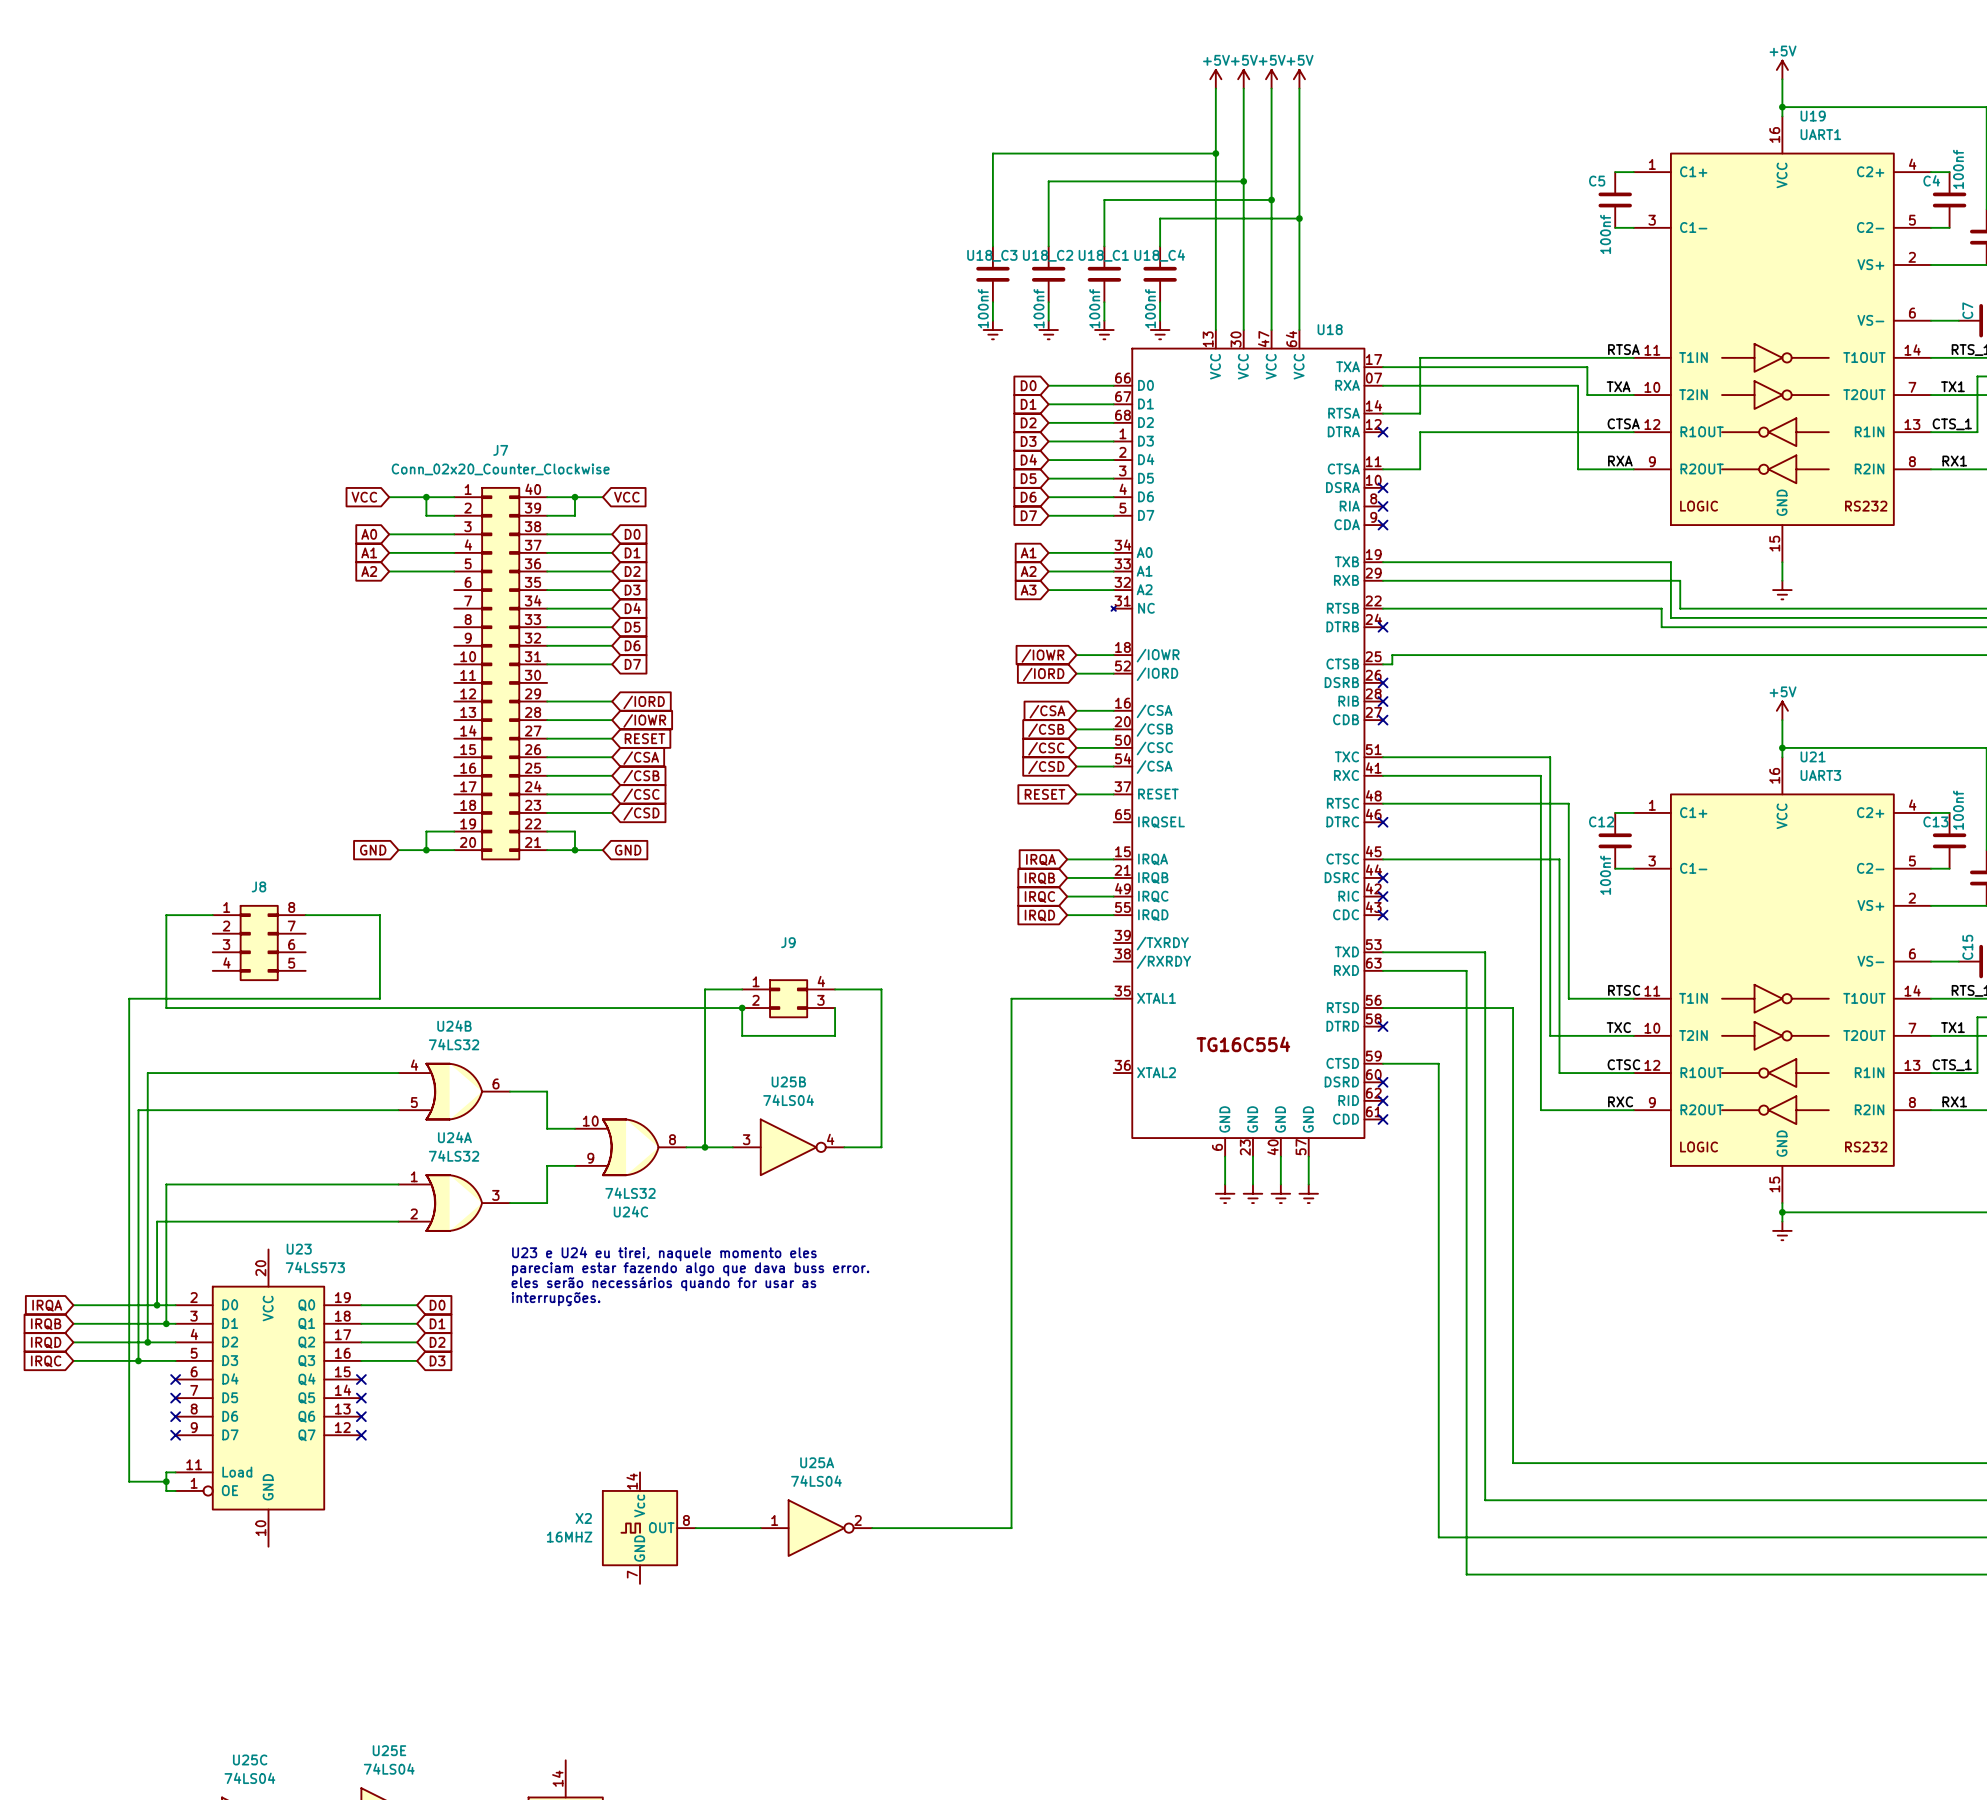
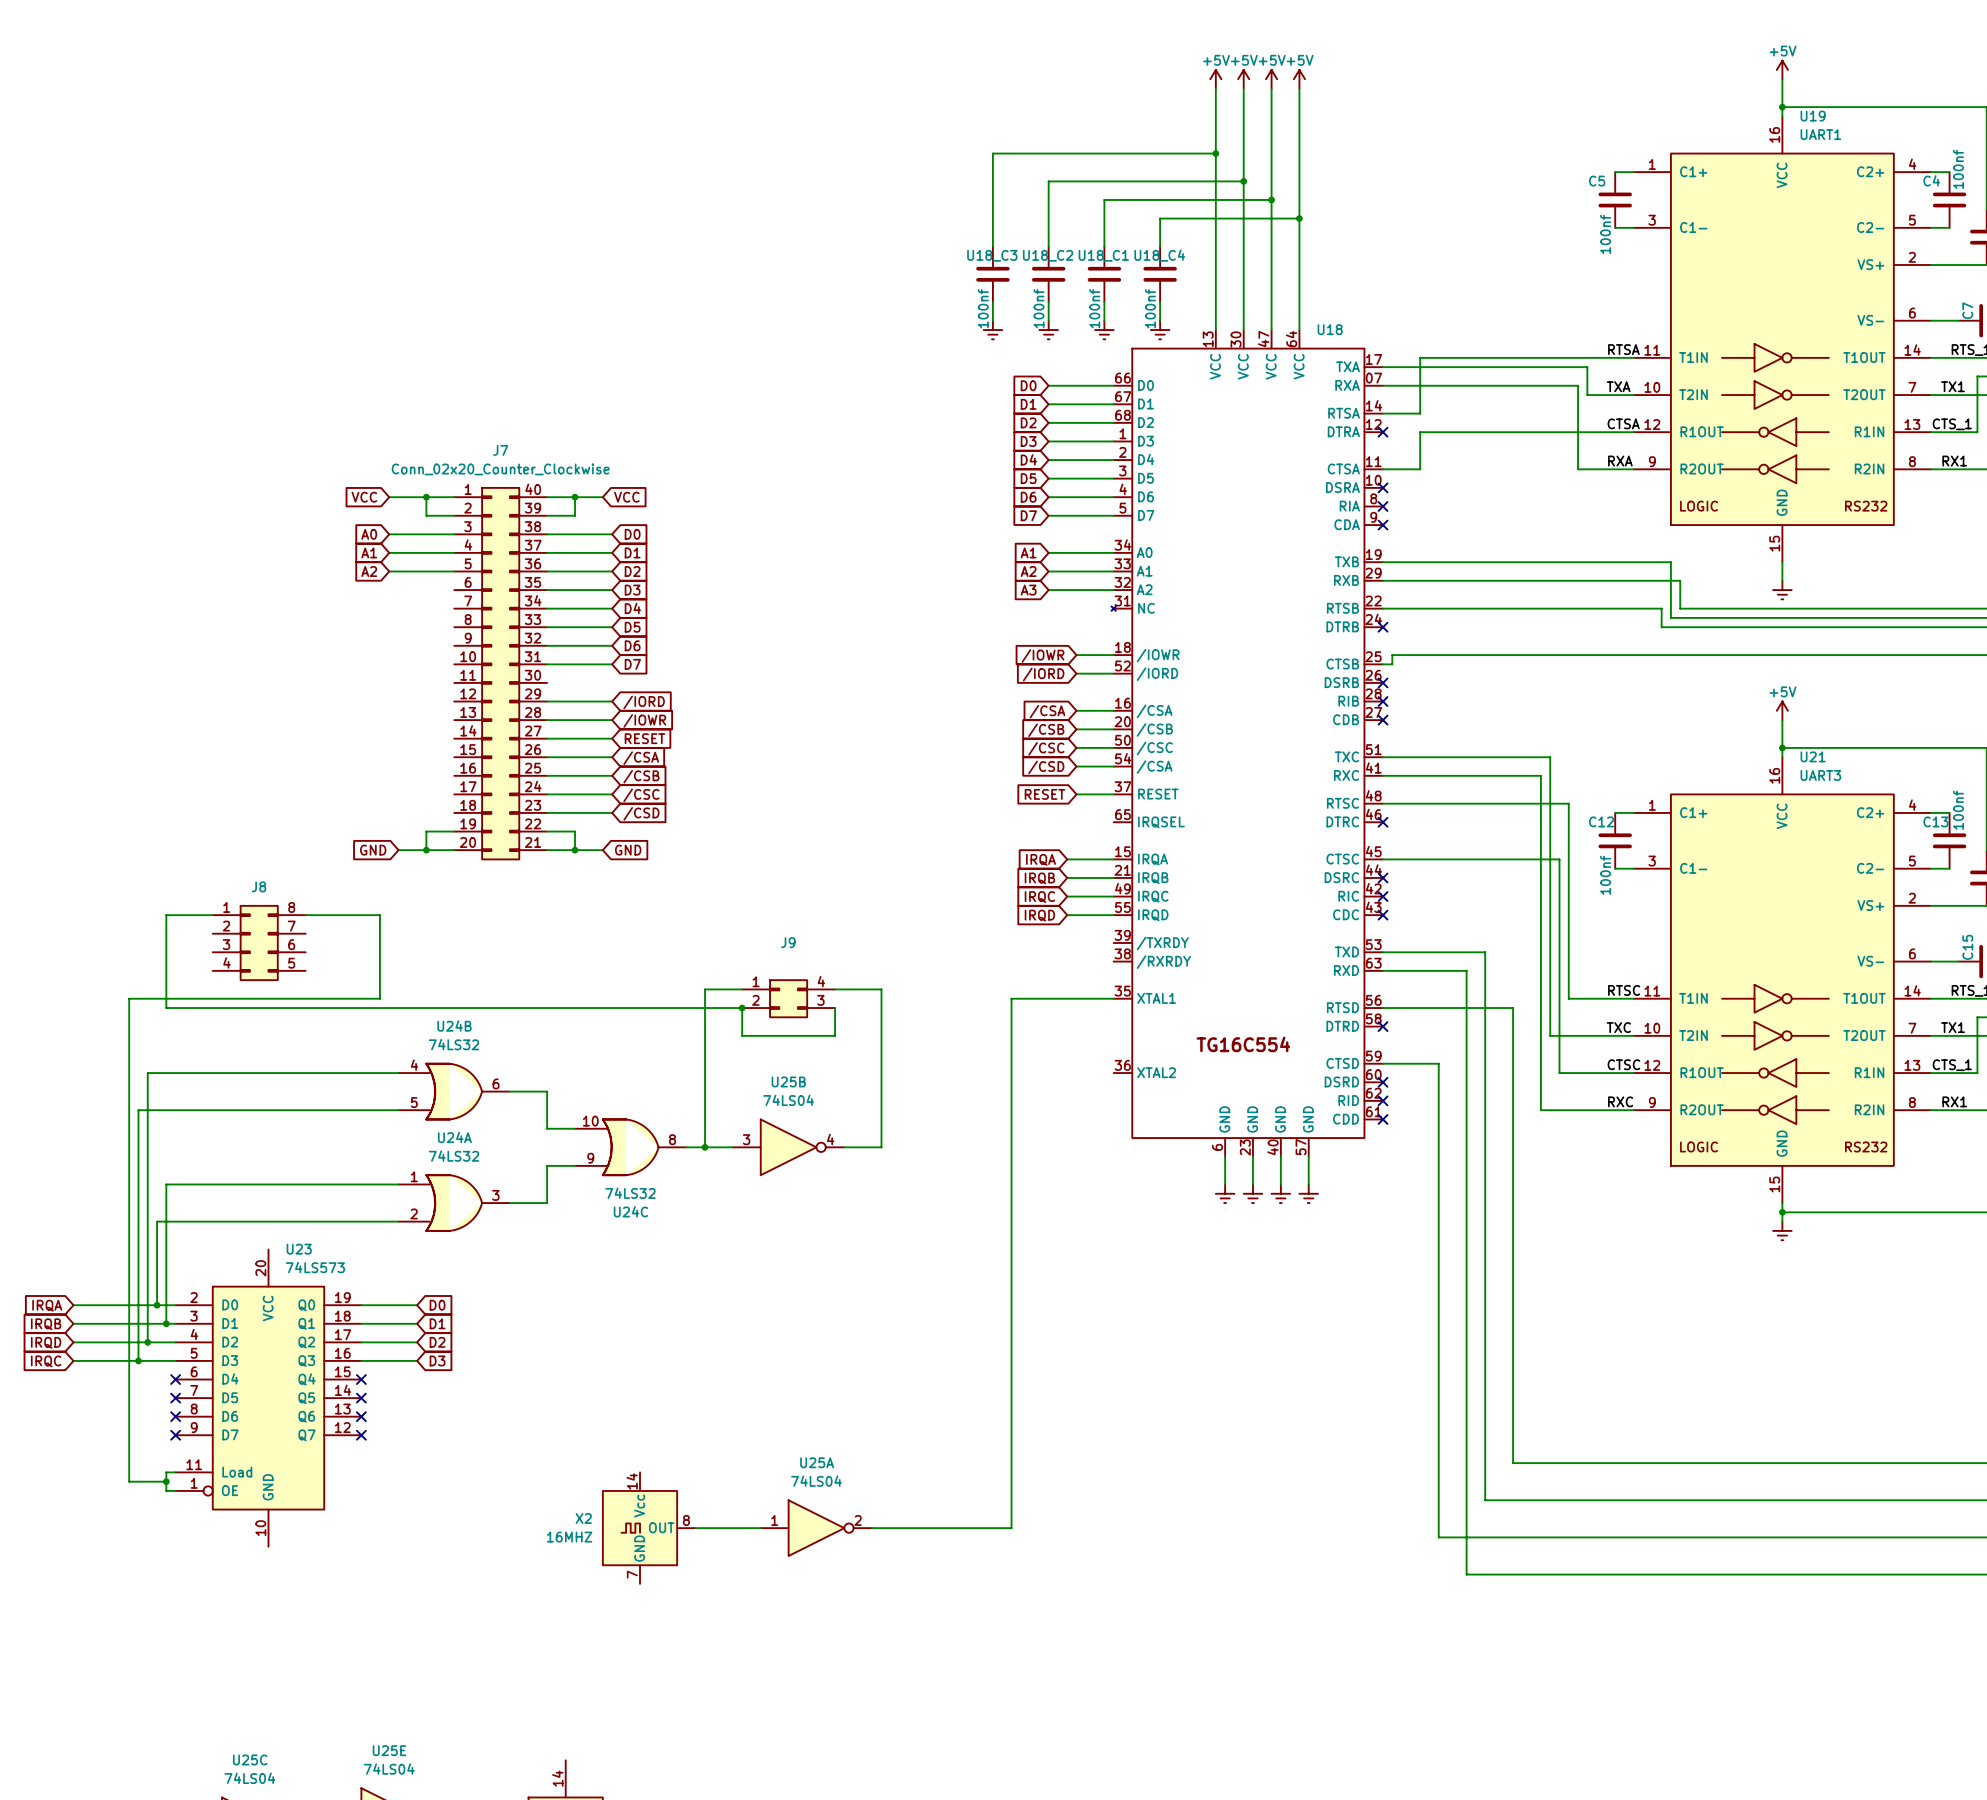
text: U23 e U24 eu tirei, naquele momento eles (664, 1254) -> none
text: pareciam estar fazendo algo que dava buss error. (690, 1269) -> none
text: eles serão necessários quando for usar as (663, 1283) -> none
text: interrupções. (556, 1299) -> none

